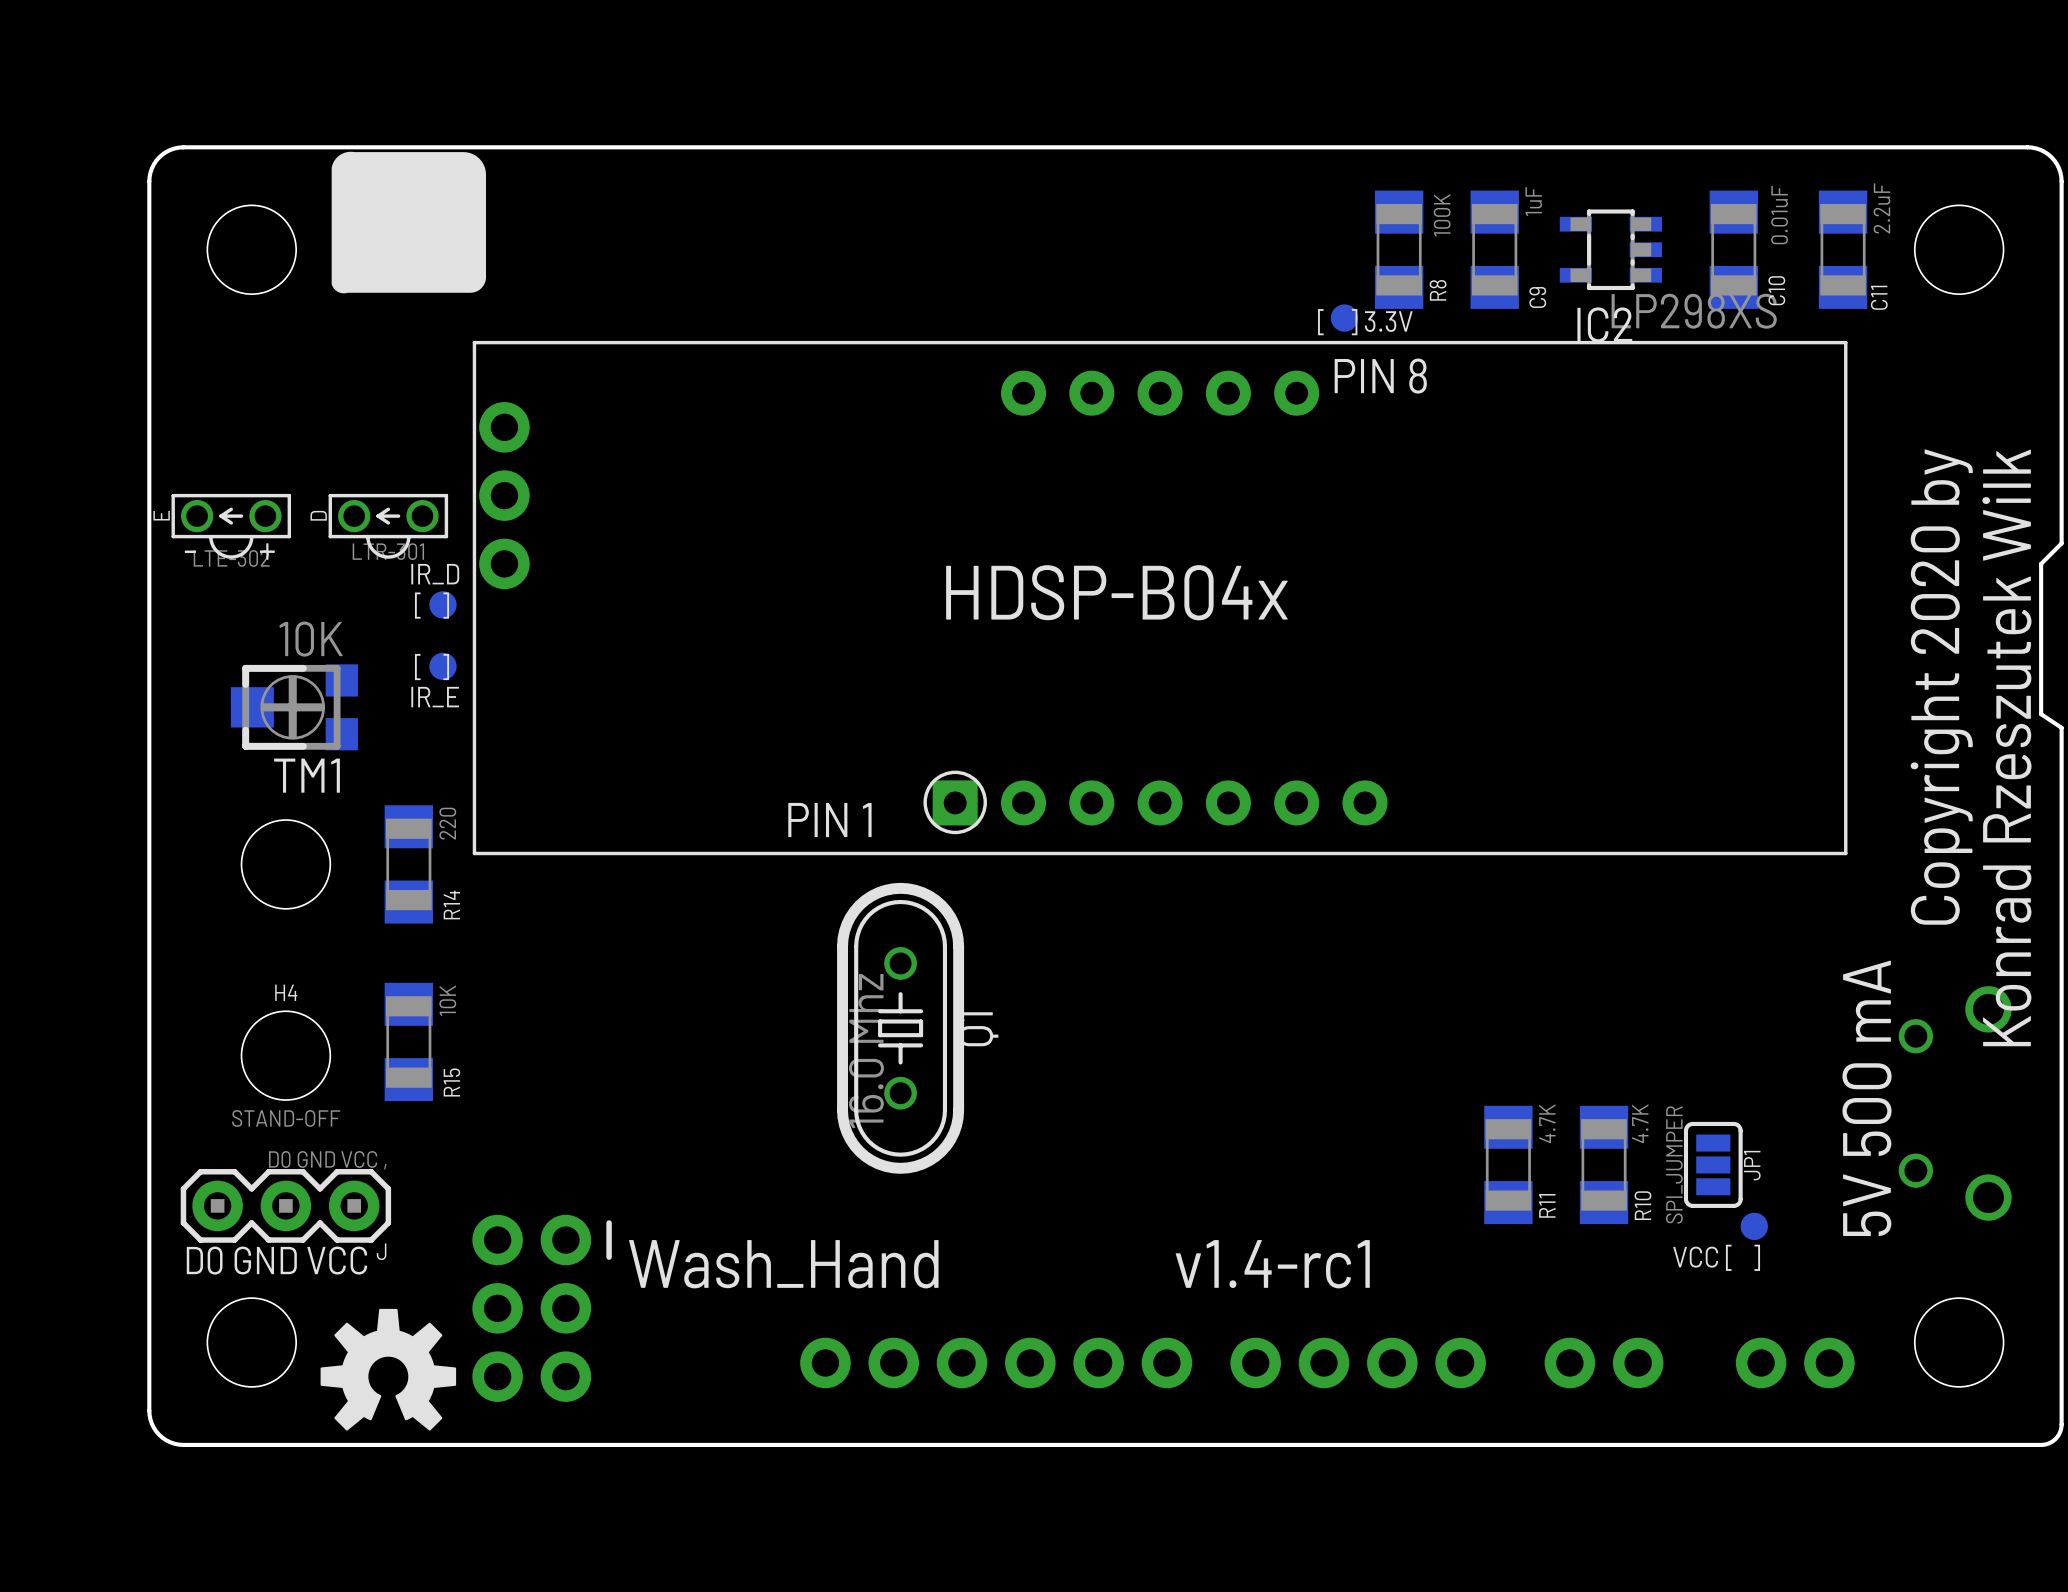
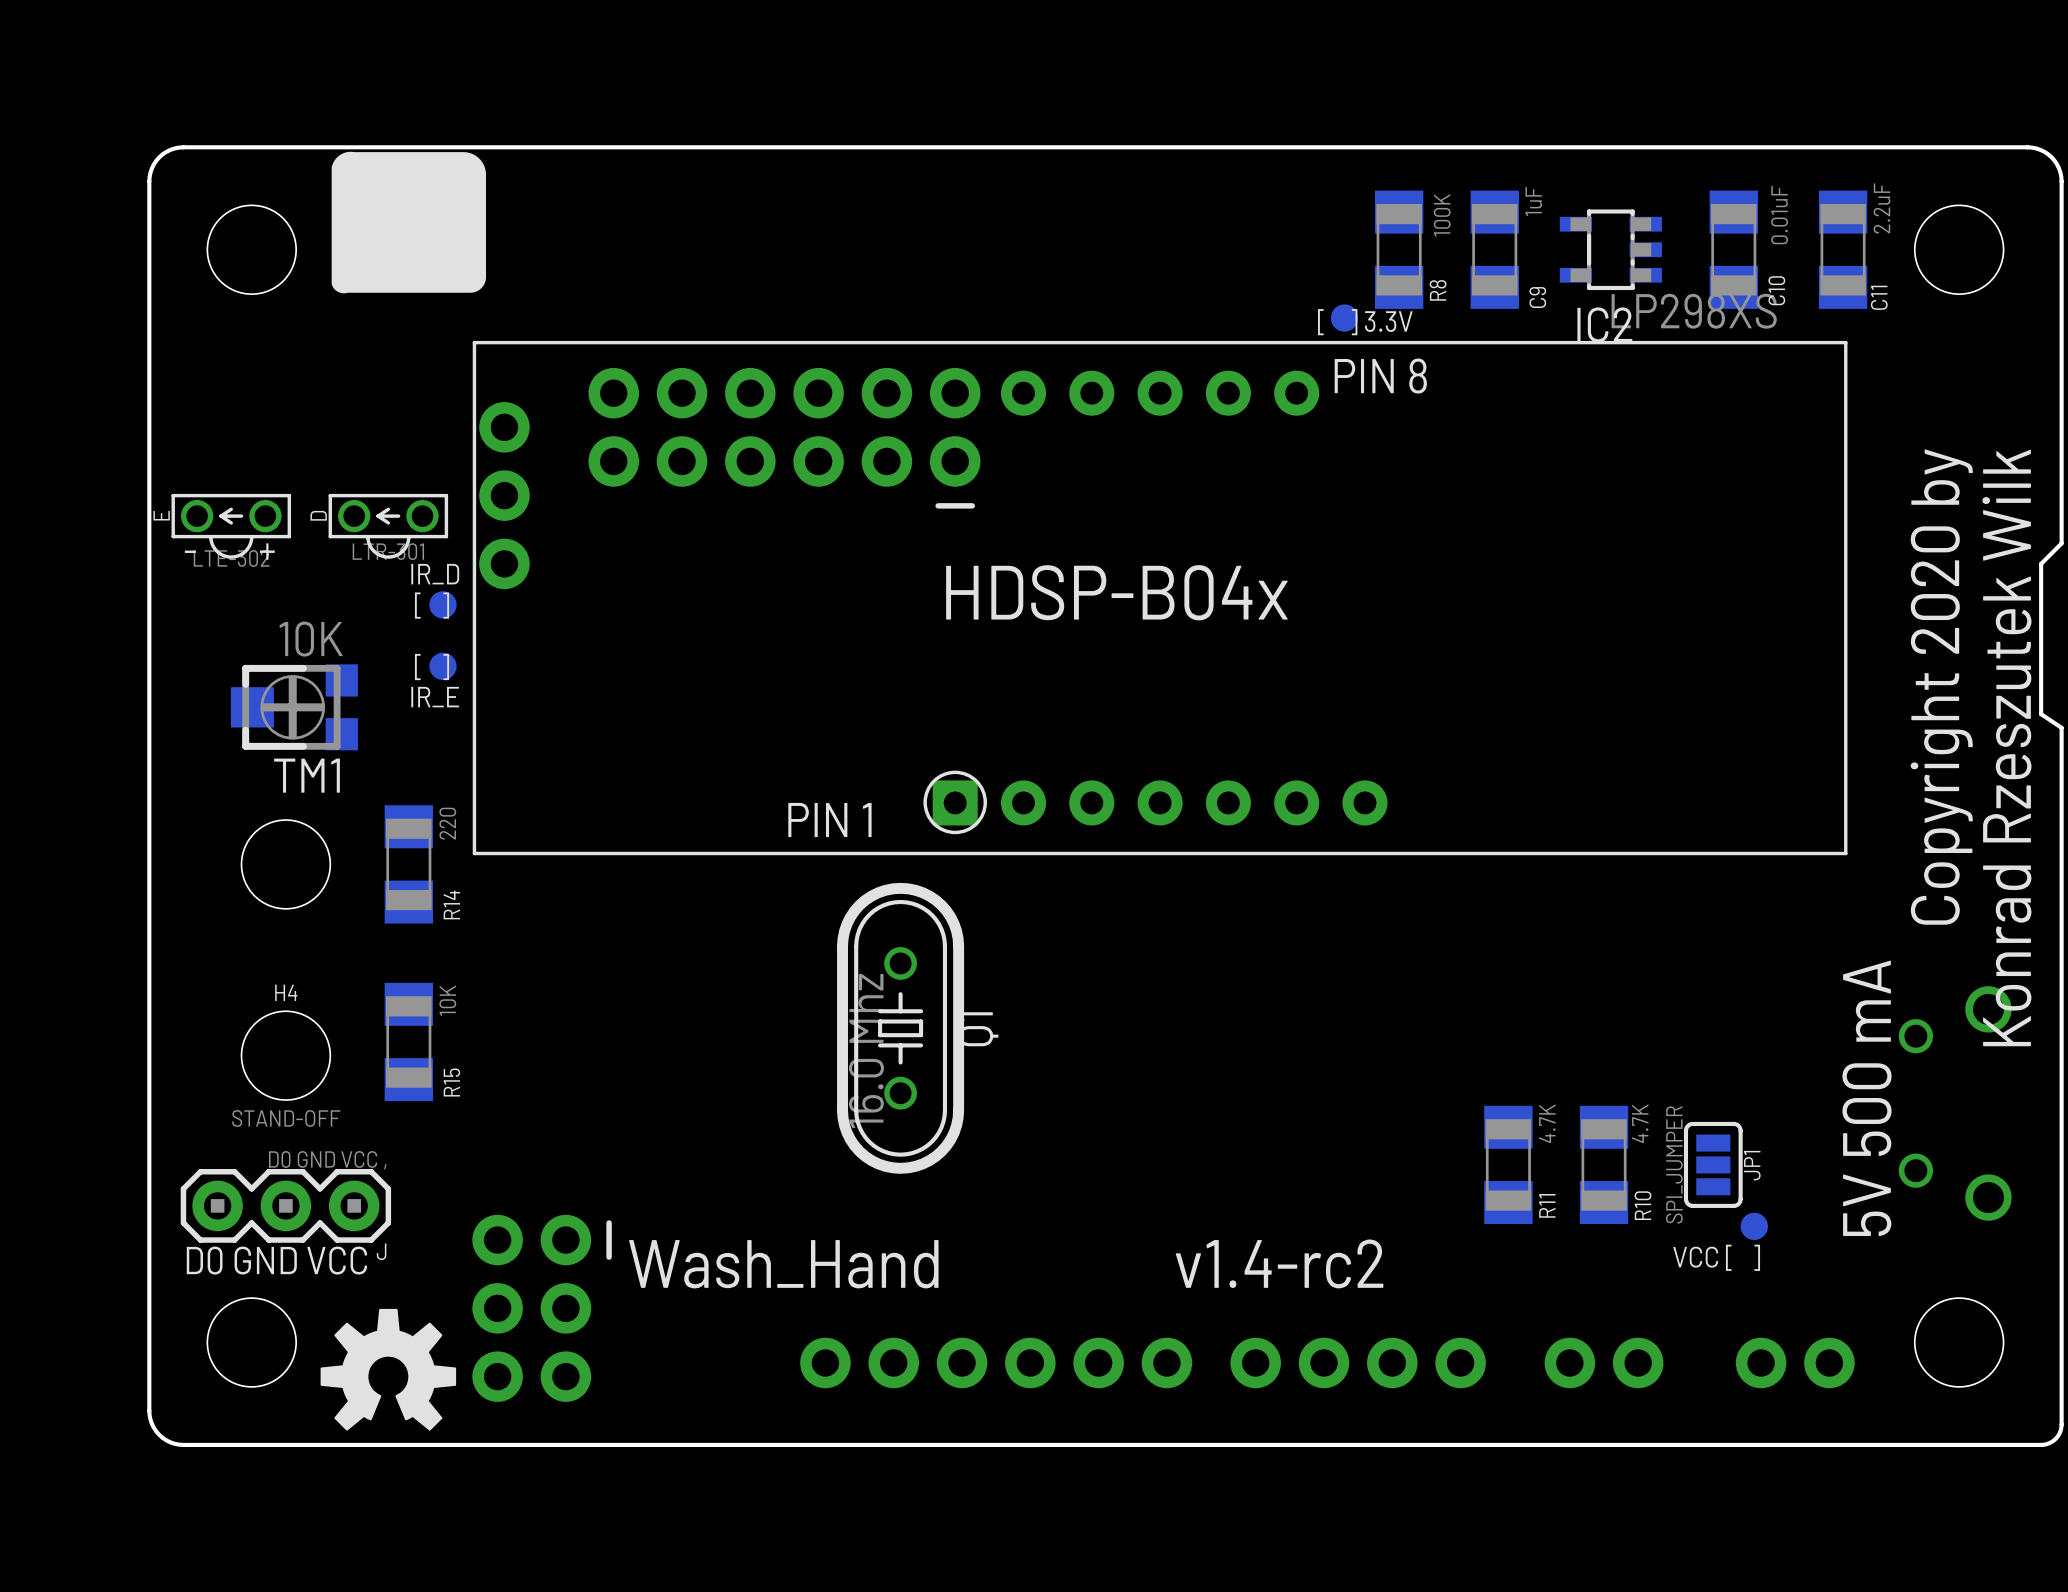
part: none -> (784, 438)
text: v1.4-rc1 (1272, 1264) -> v1.4-rc2 (1279, 1263)

